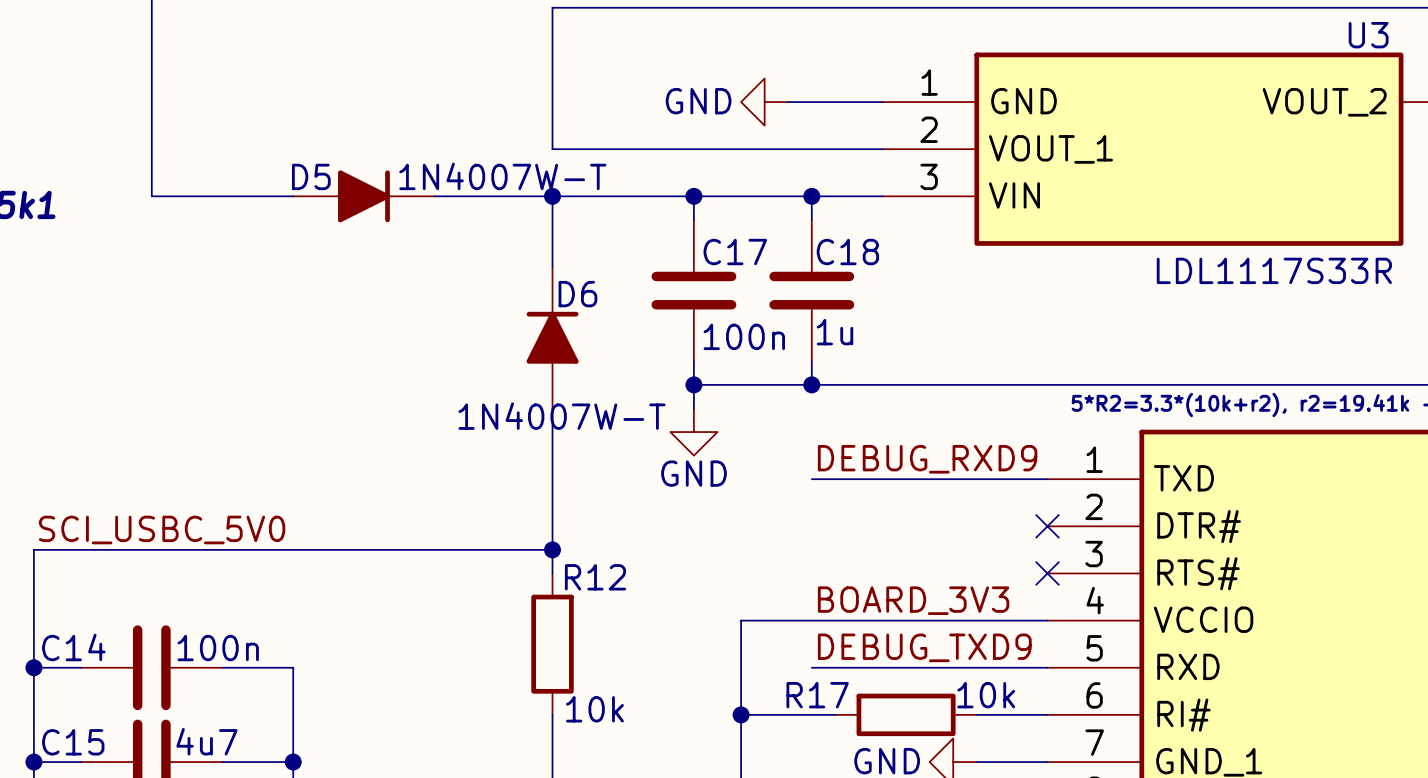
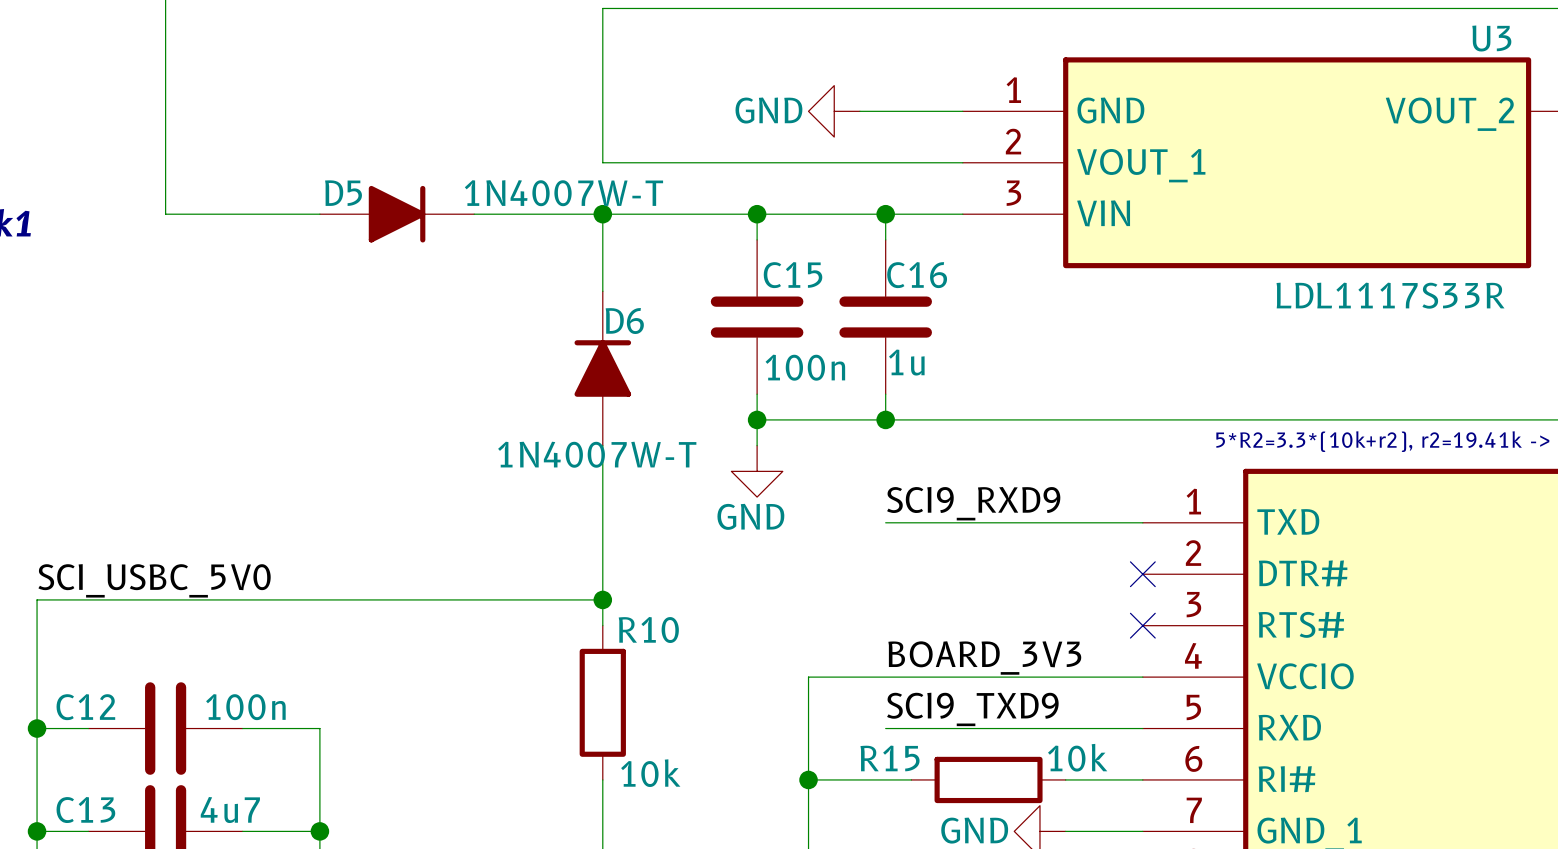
C17 name: C17 (735, 252) -> C15 (793, 275)
C18 name: C18 (847, 252) -> C16 (917, 275)
label: DEBUG_RXD9 (927, 459) -> SCI9_RXD9 (973, 503)
R12 name: R12 (595, 577) -> R10 (648, 629)
C14 name: C14 (73, 647) -> C12 (85, 707)
label: DEBUG_TXD9 (924, 647) -> SCI9_TXD9 (972, 709)
R17 name: R17 (817, 695) -> R15 (890, 758)
C15 name: C15 (73, 742) -> C13 (85, 810)

